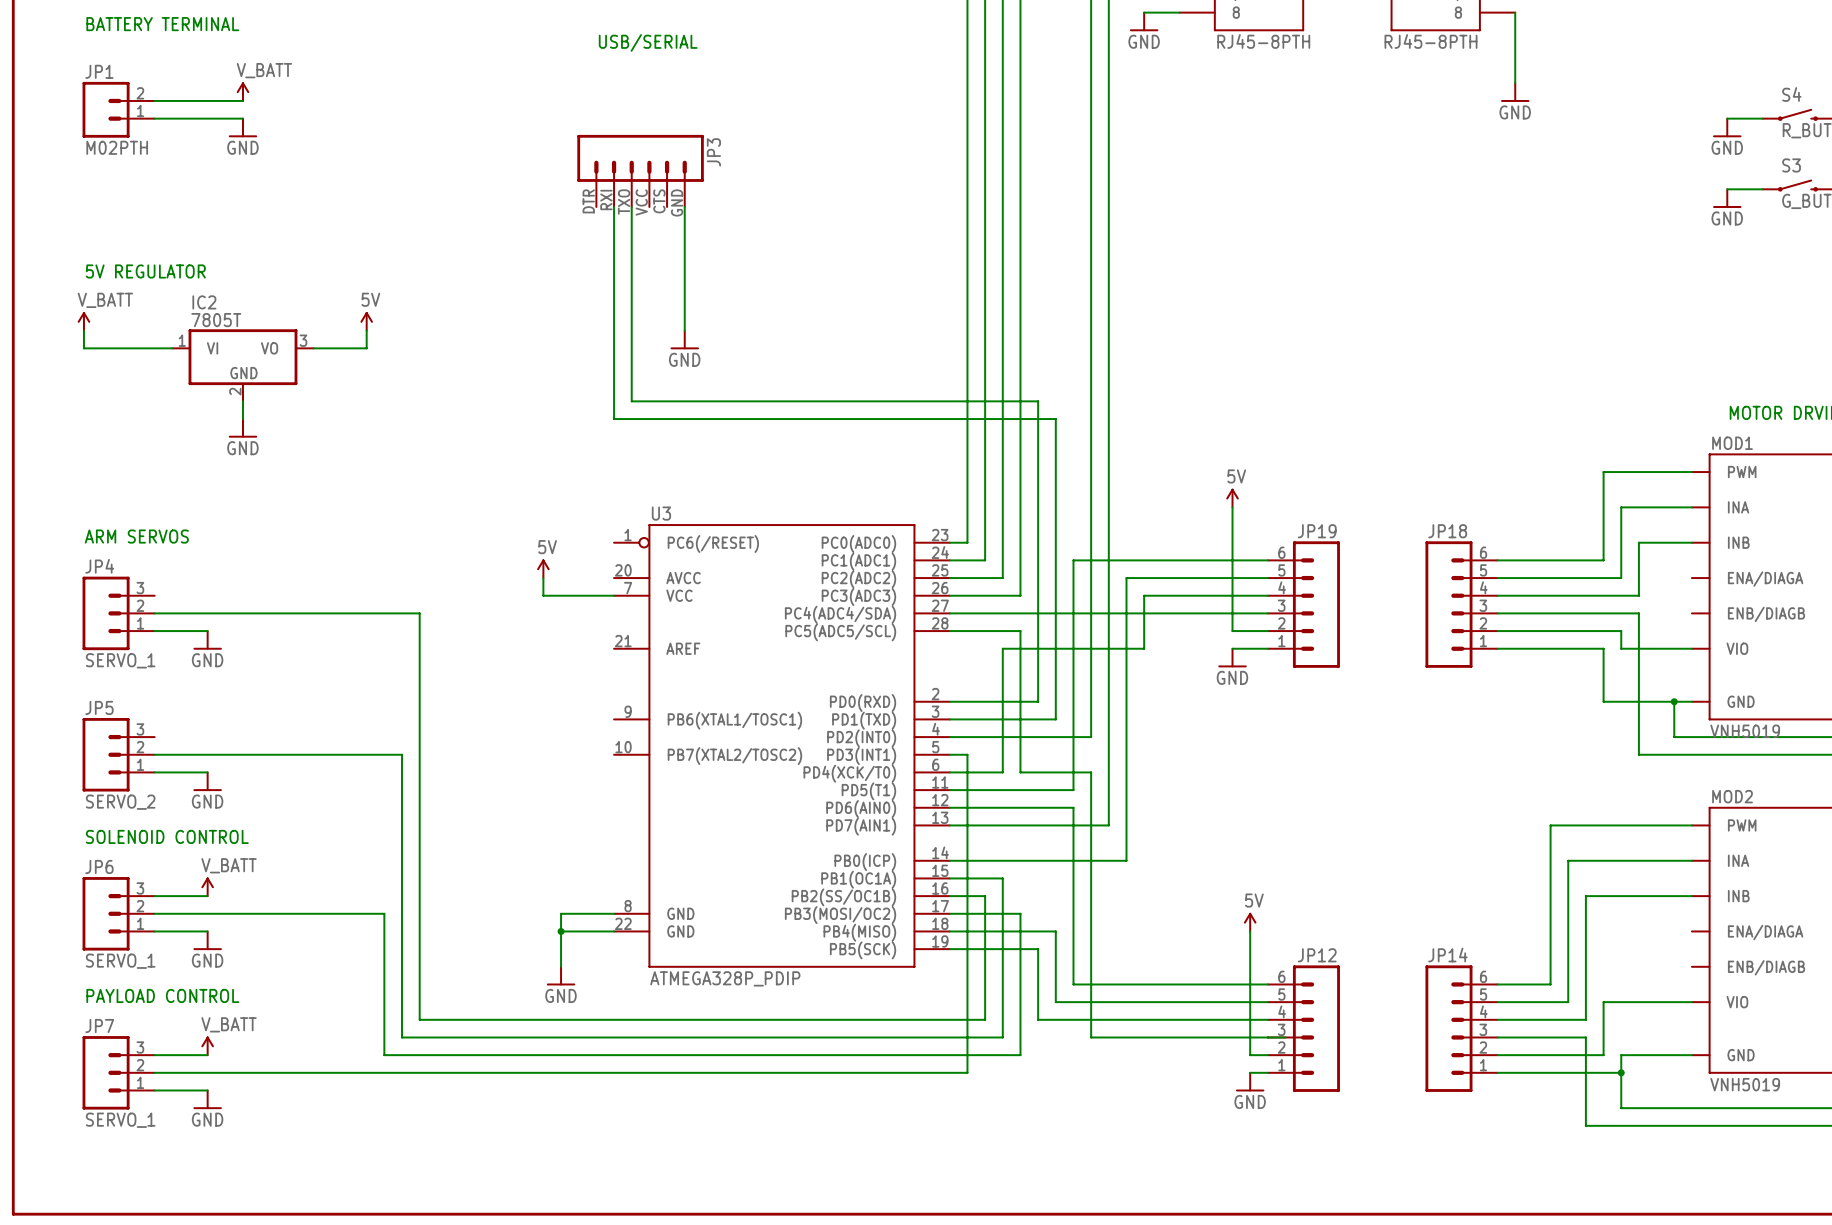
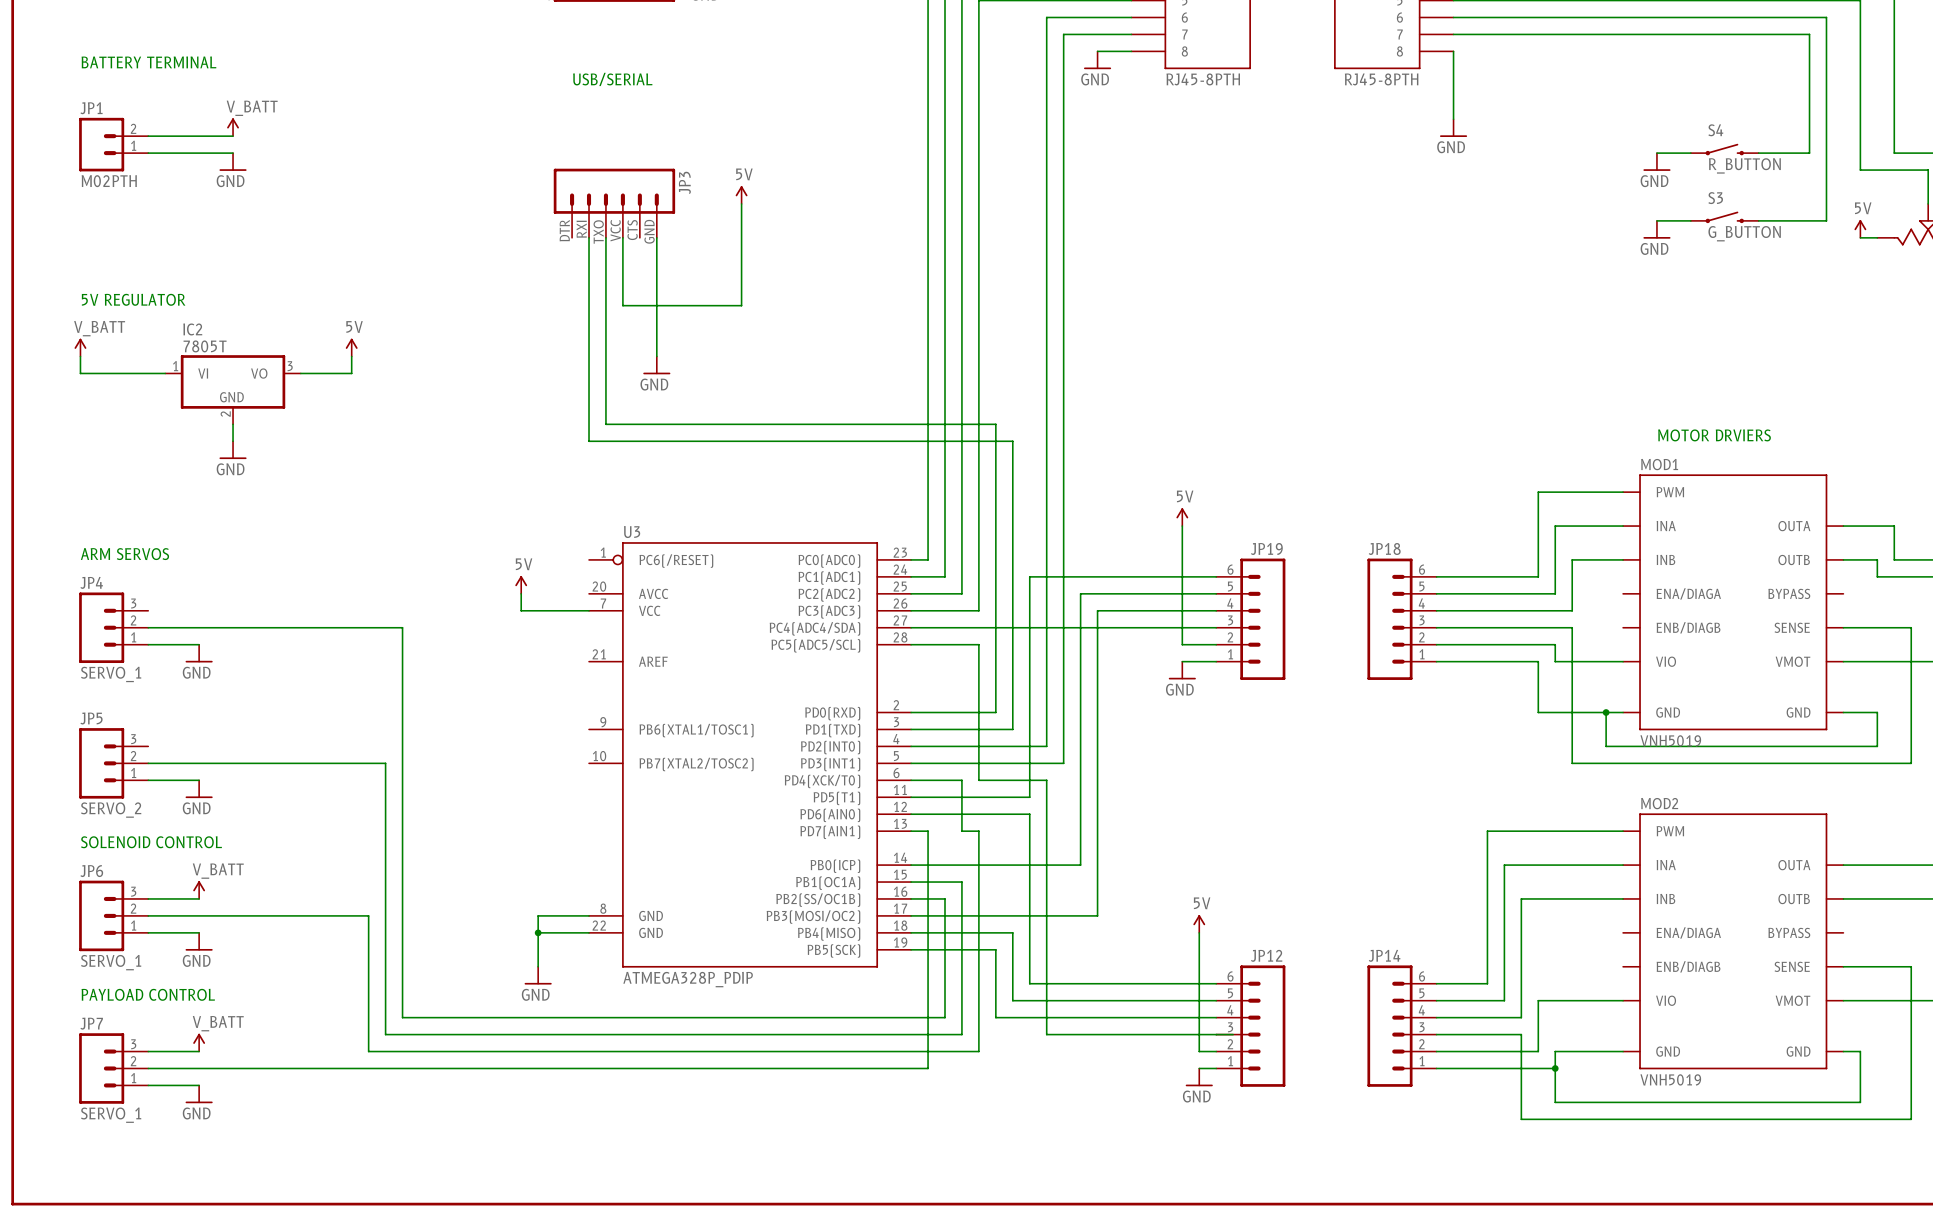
power symbol: none -> 5V (741, 195)
wire: none -> (741, 203) (741, 305) (622, 305) (622, 237)
wire: (1144, 648) (1002, 648) (1002, 772) -> (1097, 661) (1097, 915) (978, 915) (978, 831)
wire: (967, 754) (967, 825) (1002, 825) -> (961, 780) (961, 831)
wire: (1108, 754) (1108, 825) (1020, 825) -> (1063, 763) (928, 763)

